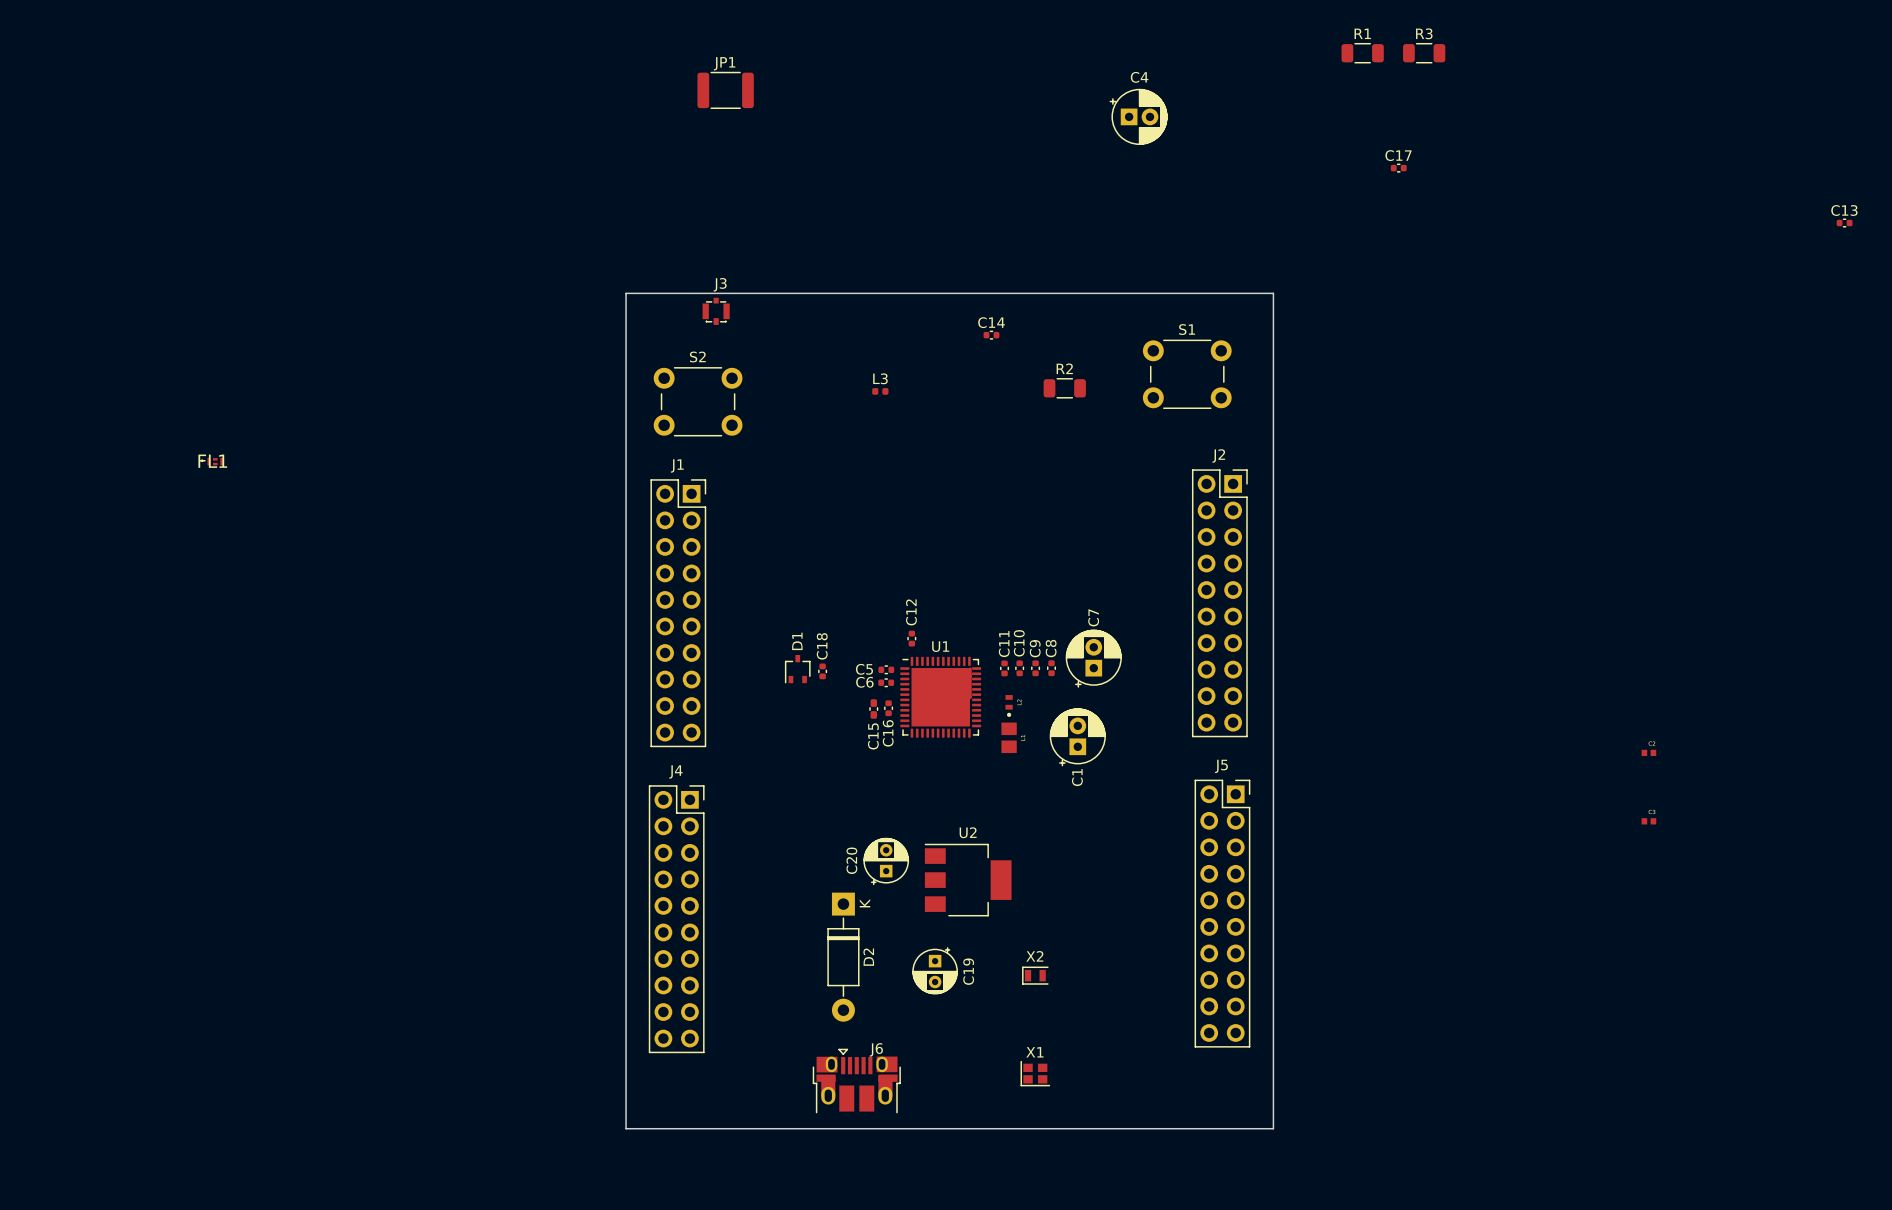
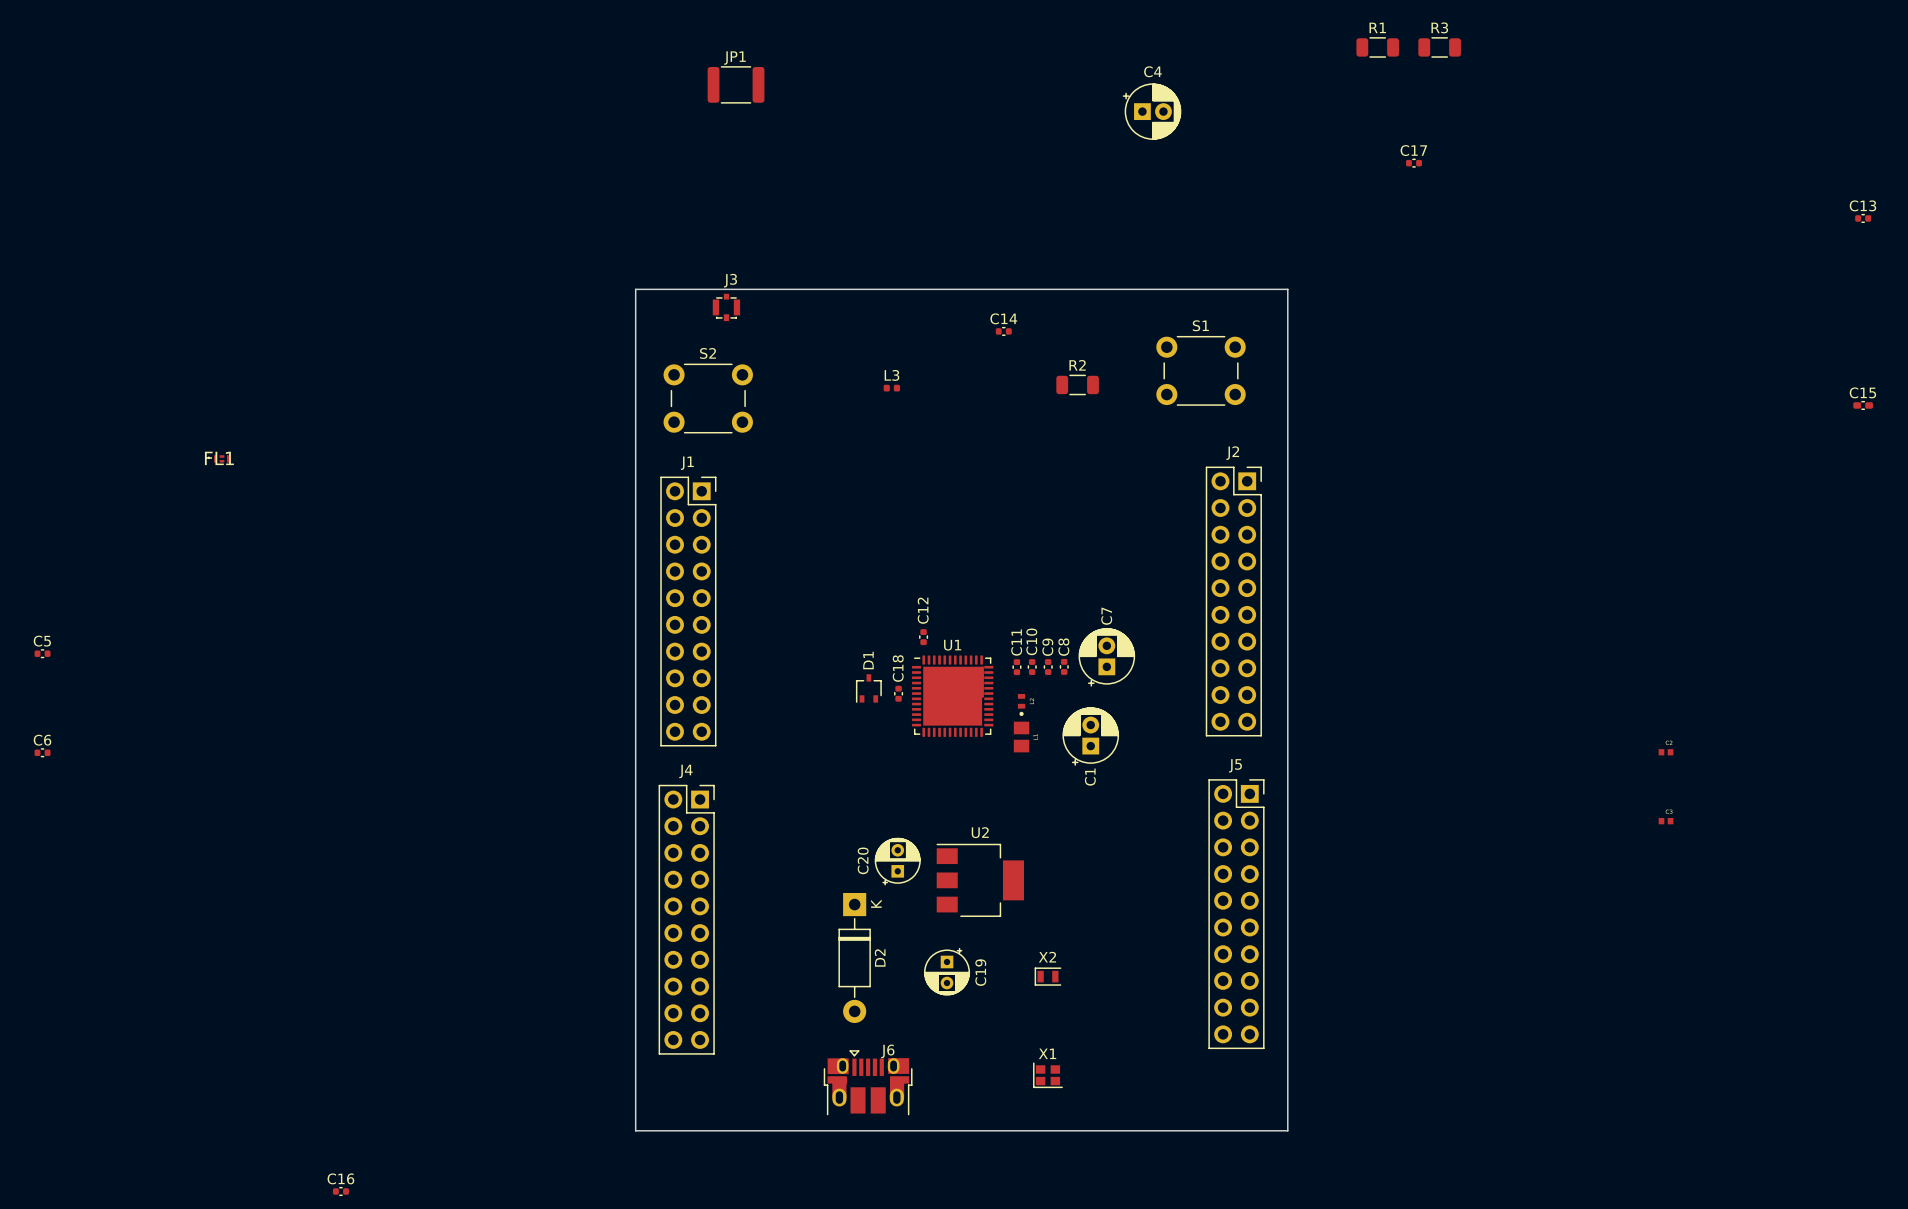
D1 position: (797, 669) -> (868, 688)
C5 name position: C5 (864, 669) -> C5 (42, 641)
C5 position: (886, 669) -> (42, 653)
C18 position: (822, 671) -> (898, 693)
C6 name position: C6 (864, 682) -> C6 (42, 740)
C6 position: (886, 682) -> (42, 752)
C16 rotation: 0° (888, 708) -> 90° clockwise (340, 1191)
C16 position: (888, 708) -> (340, 1191)
C15 rotation: 0° (873, 709) -> 90° clockwise (1863, 405)
C15 position: (873, 709) -> (1863, 405)
C16 name position: C16 (888, 733) -> C16 (340, 1178)
C15 name position: C15 (873, 736) -> C15 (1862, 392)

